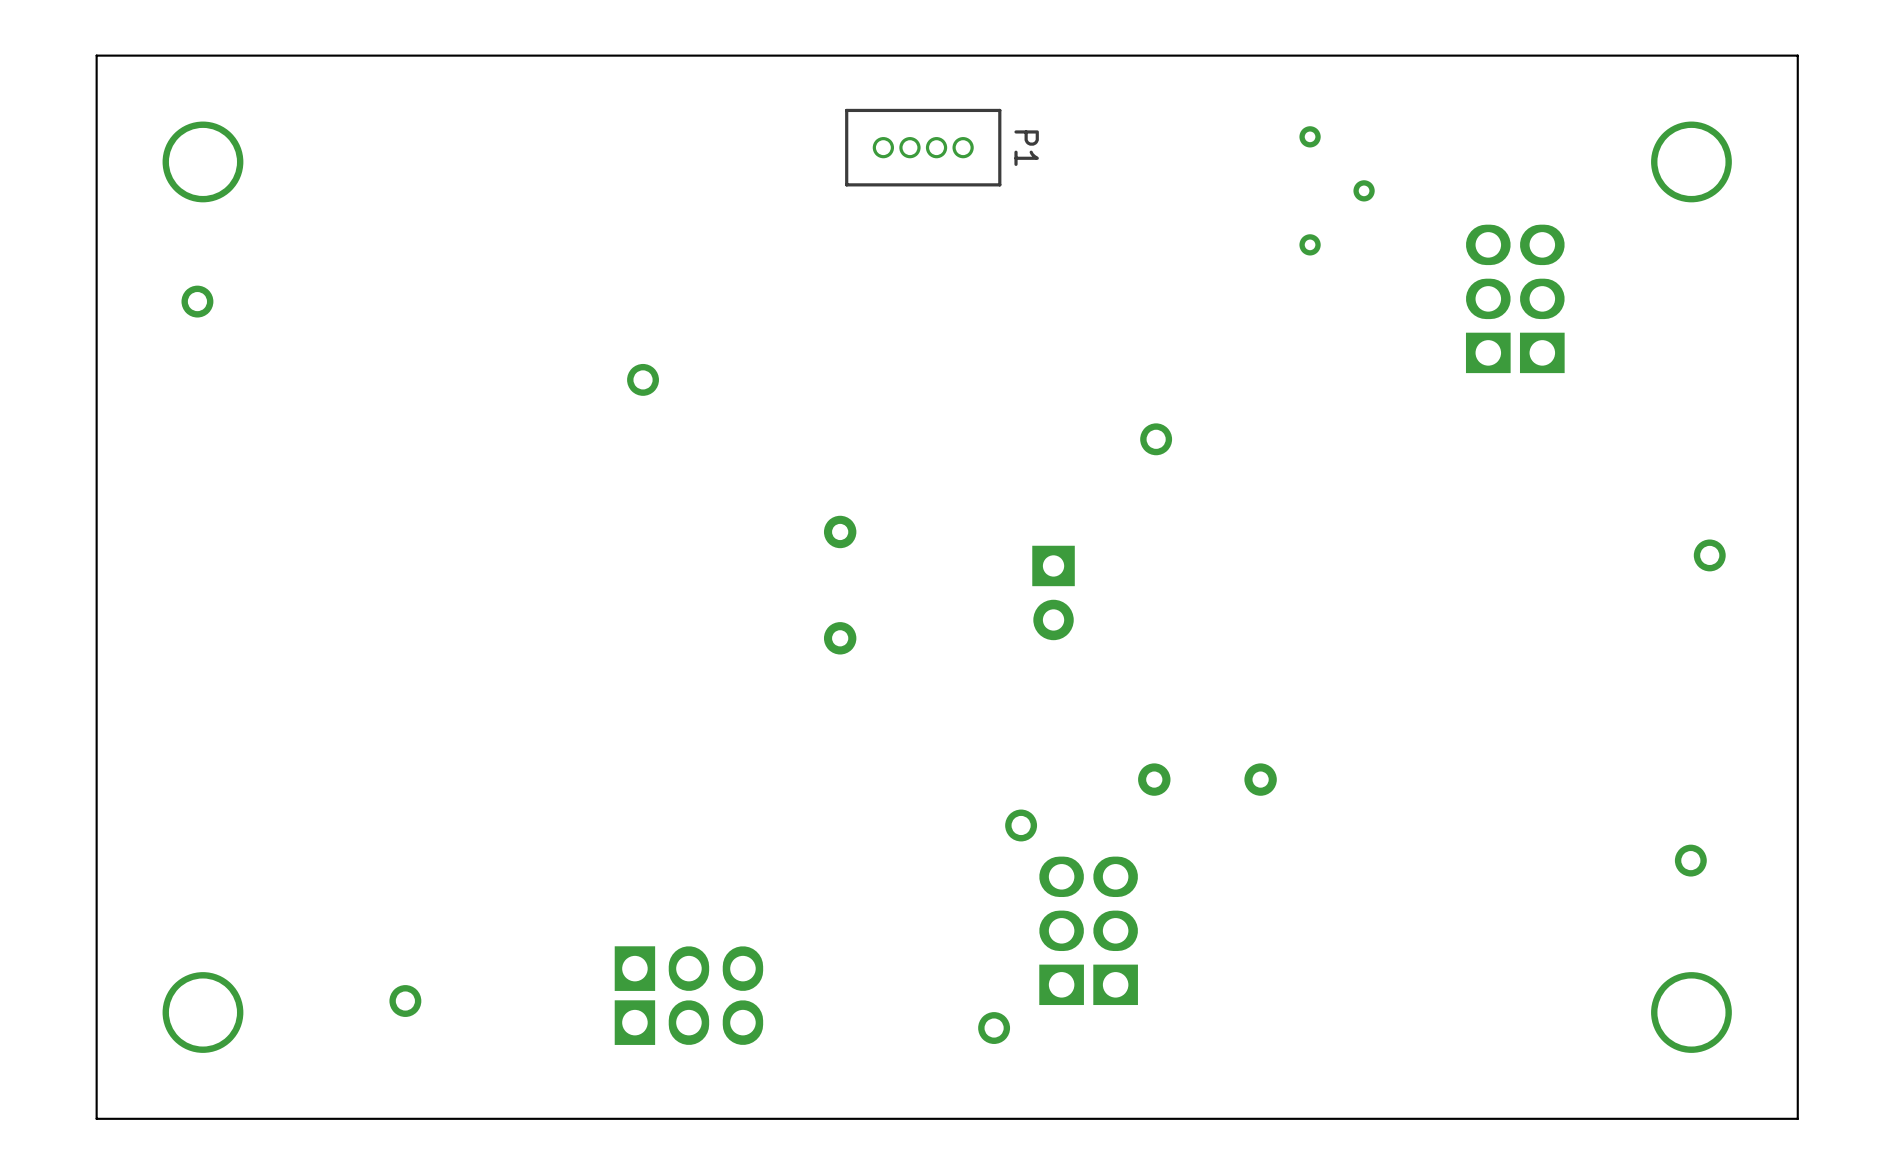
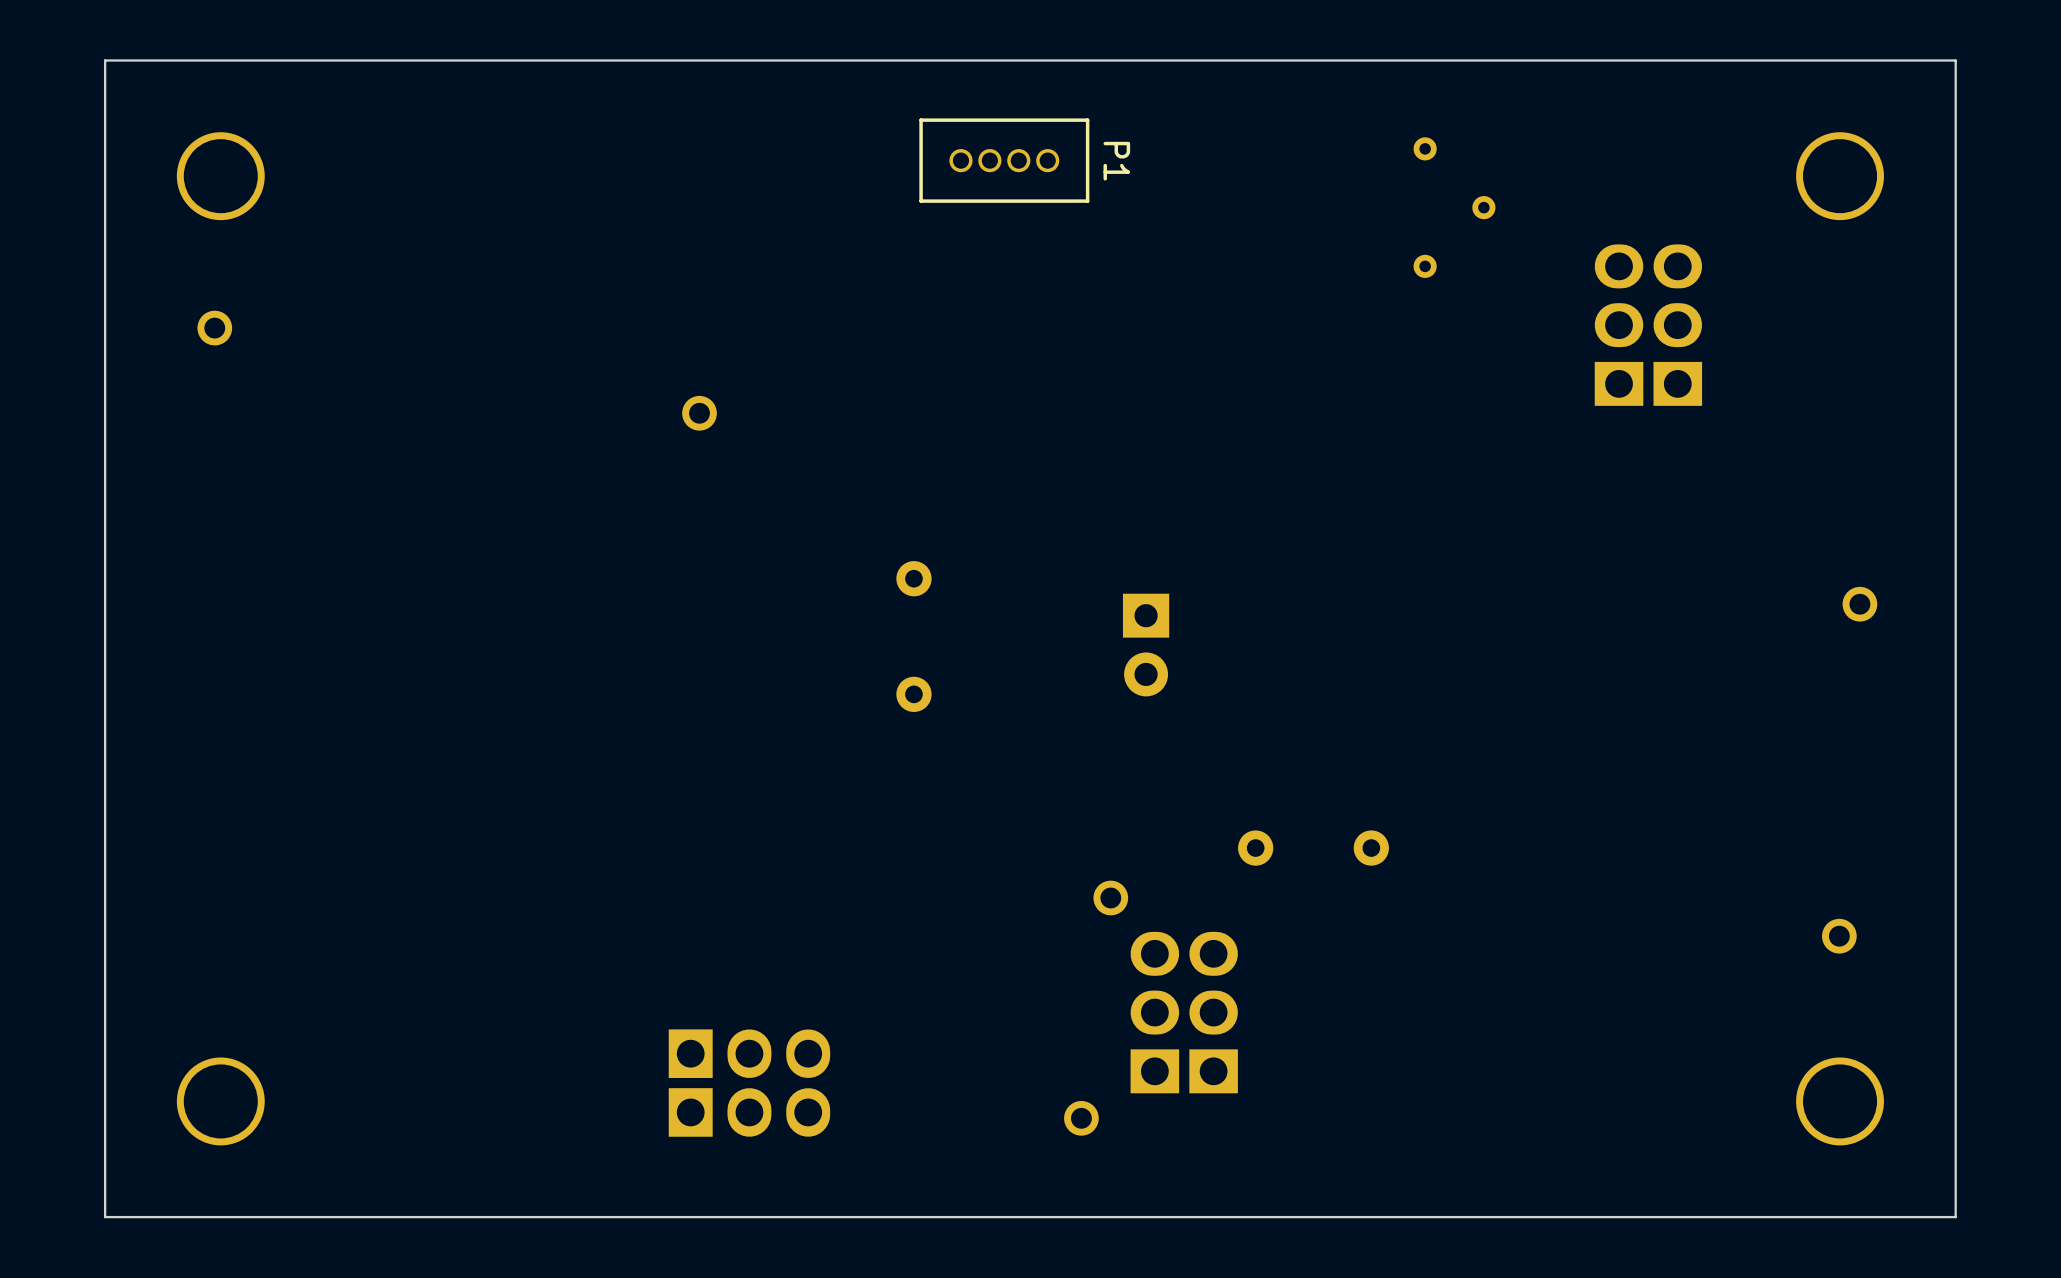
part: (1156, 439) -> none
part: (405, 1001) -> none

